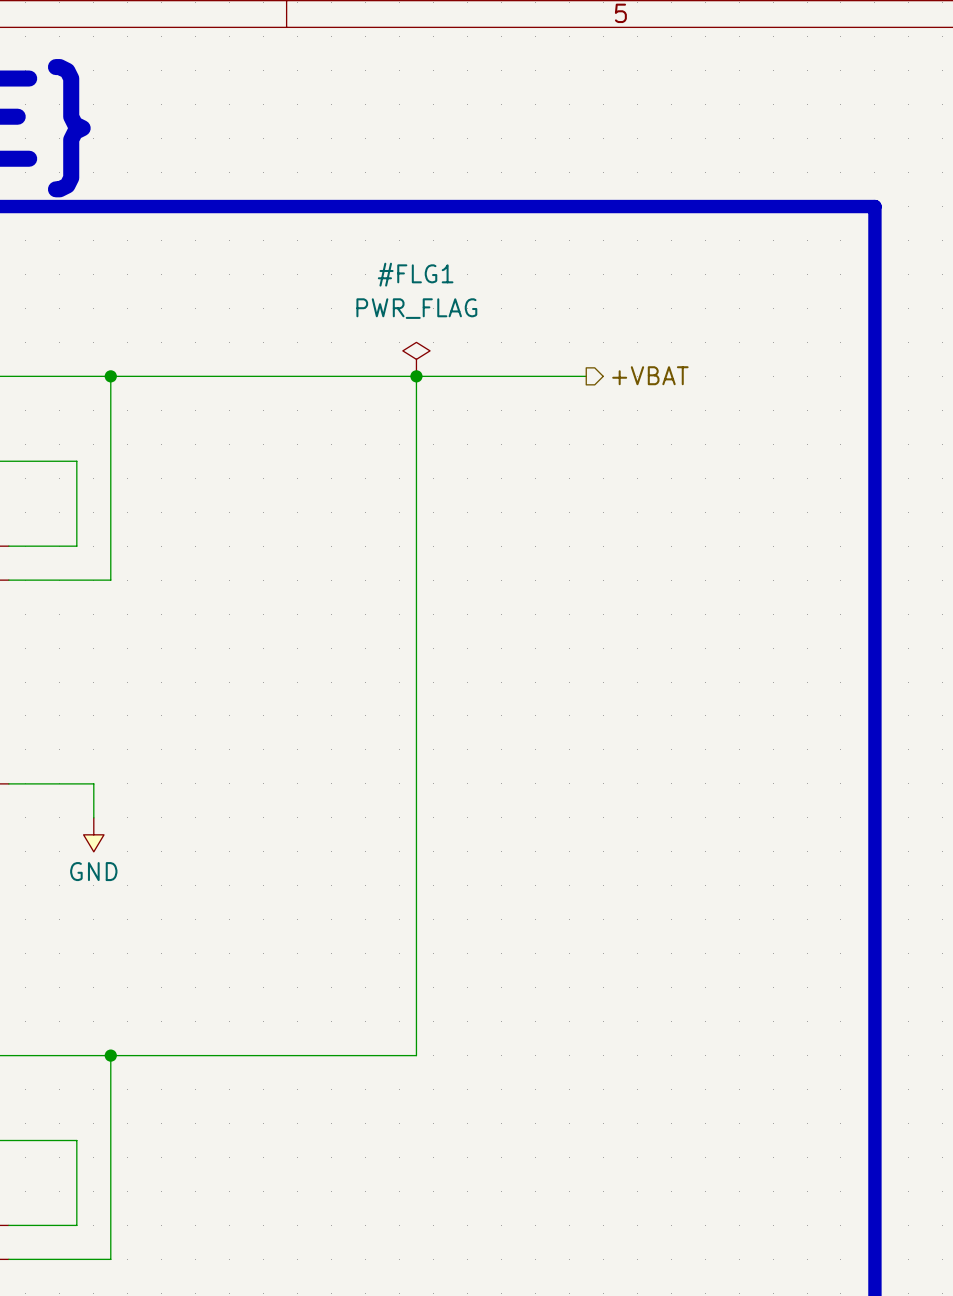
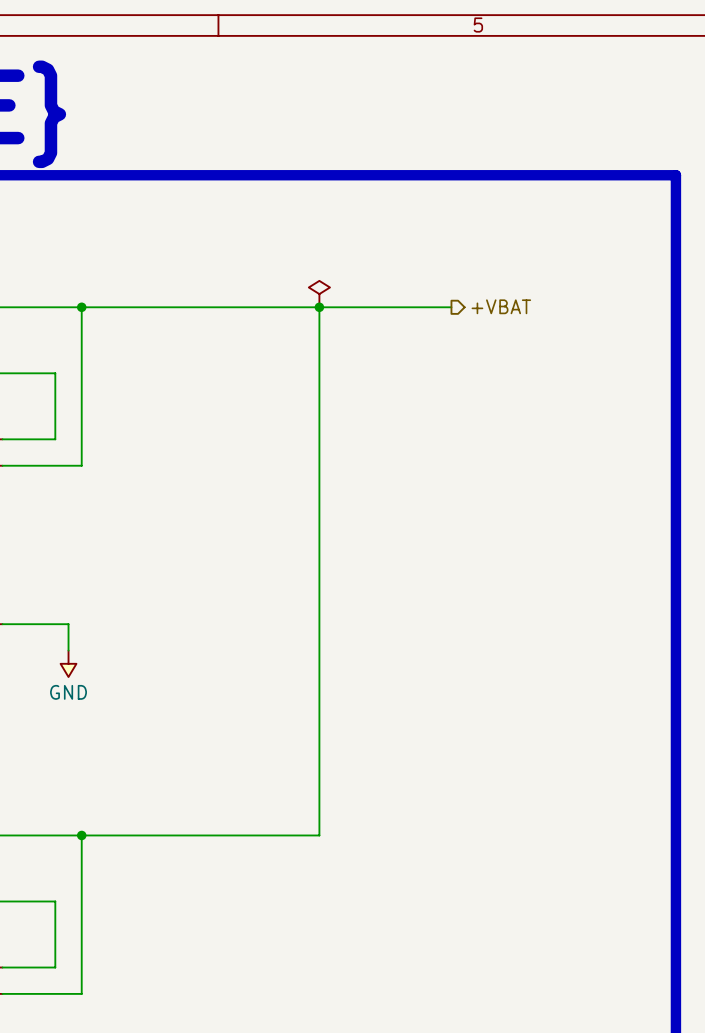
#FLG1 name: #FLG1 (415, 274) -> none
#FLG1 text: PWR_FLAG (416, 308) -> none

